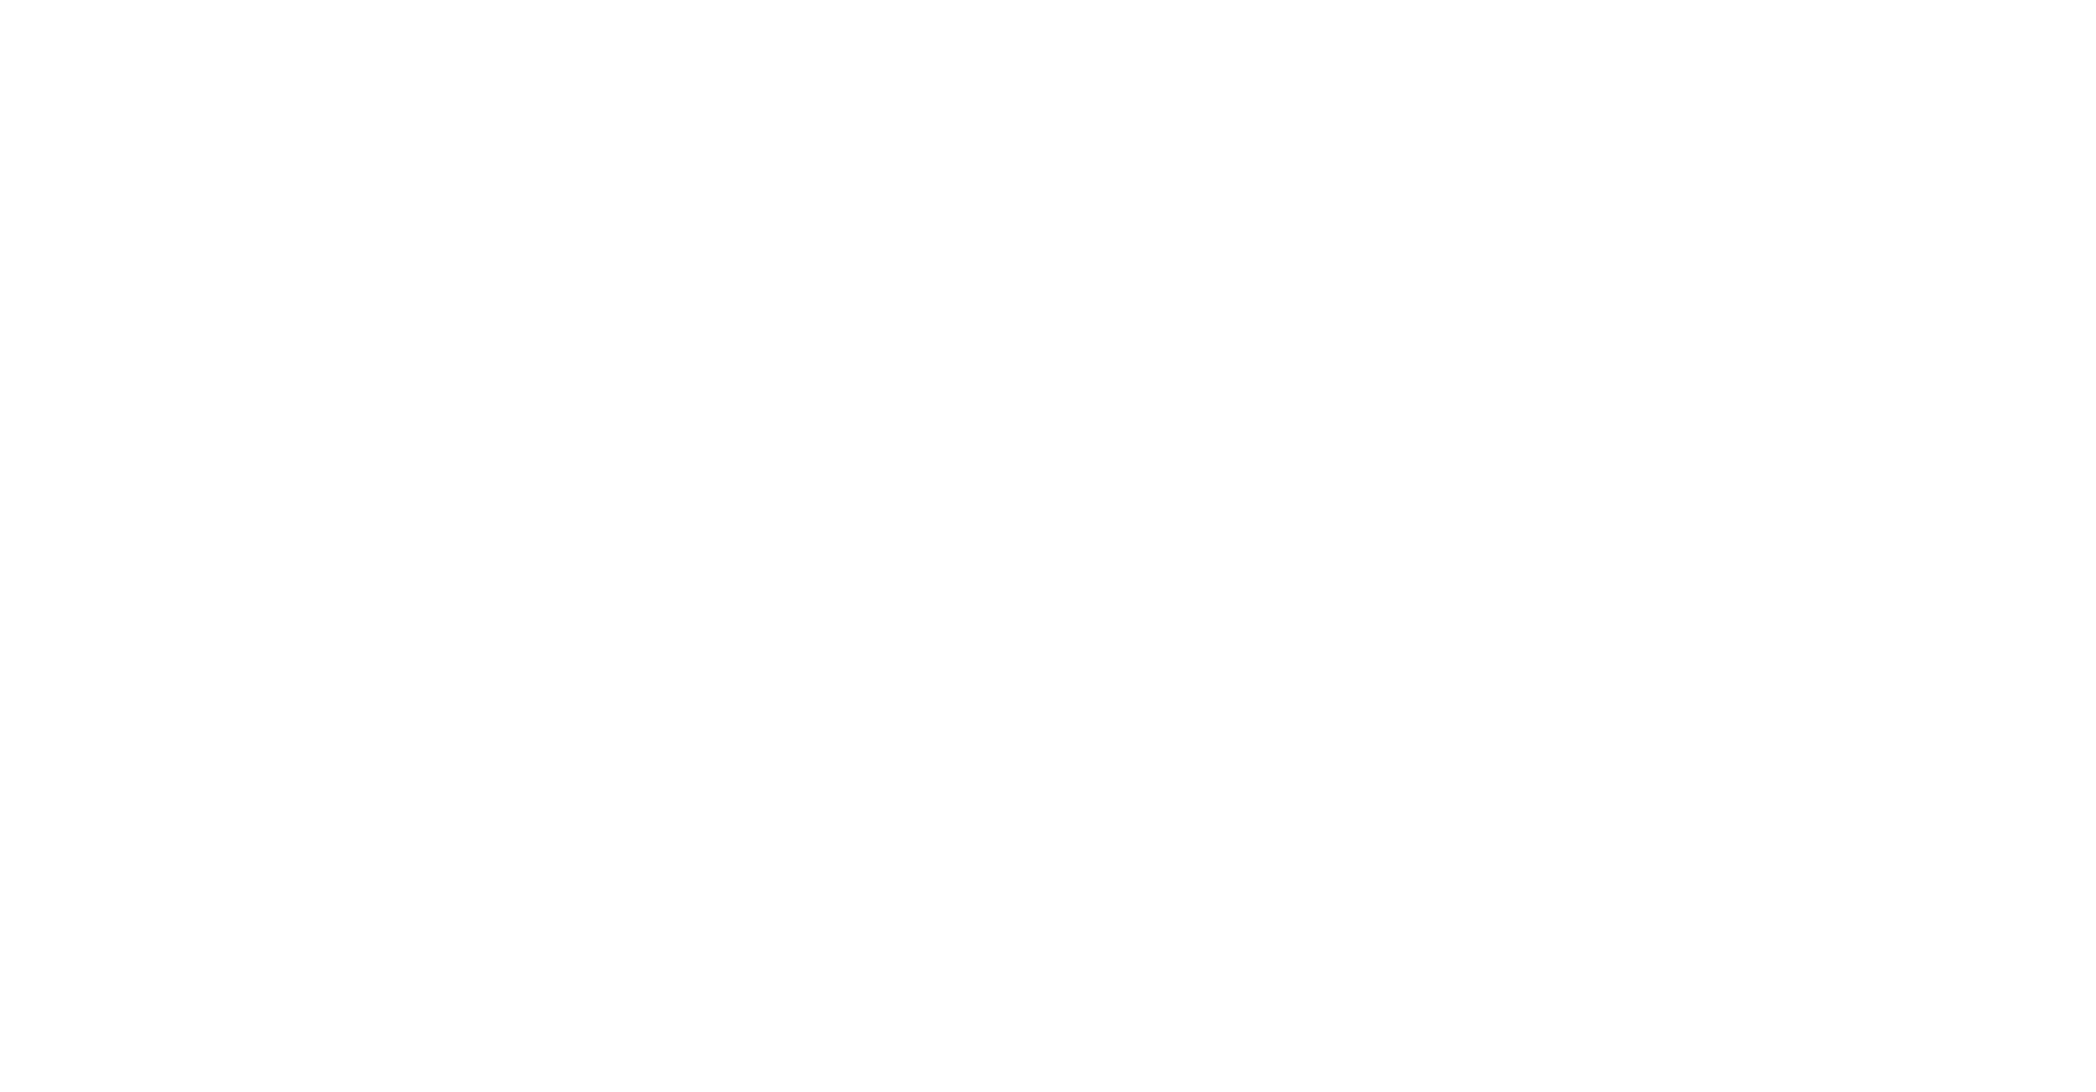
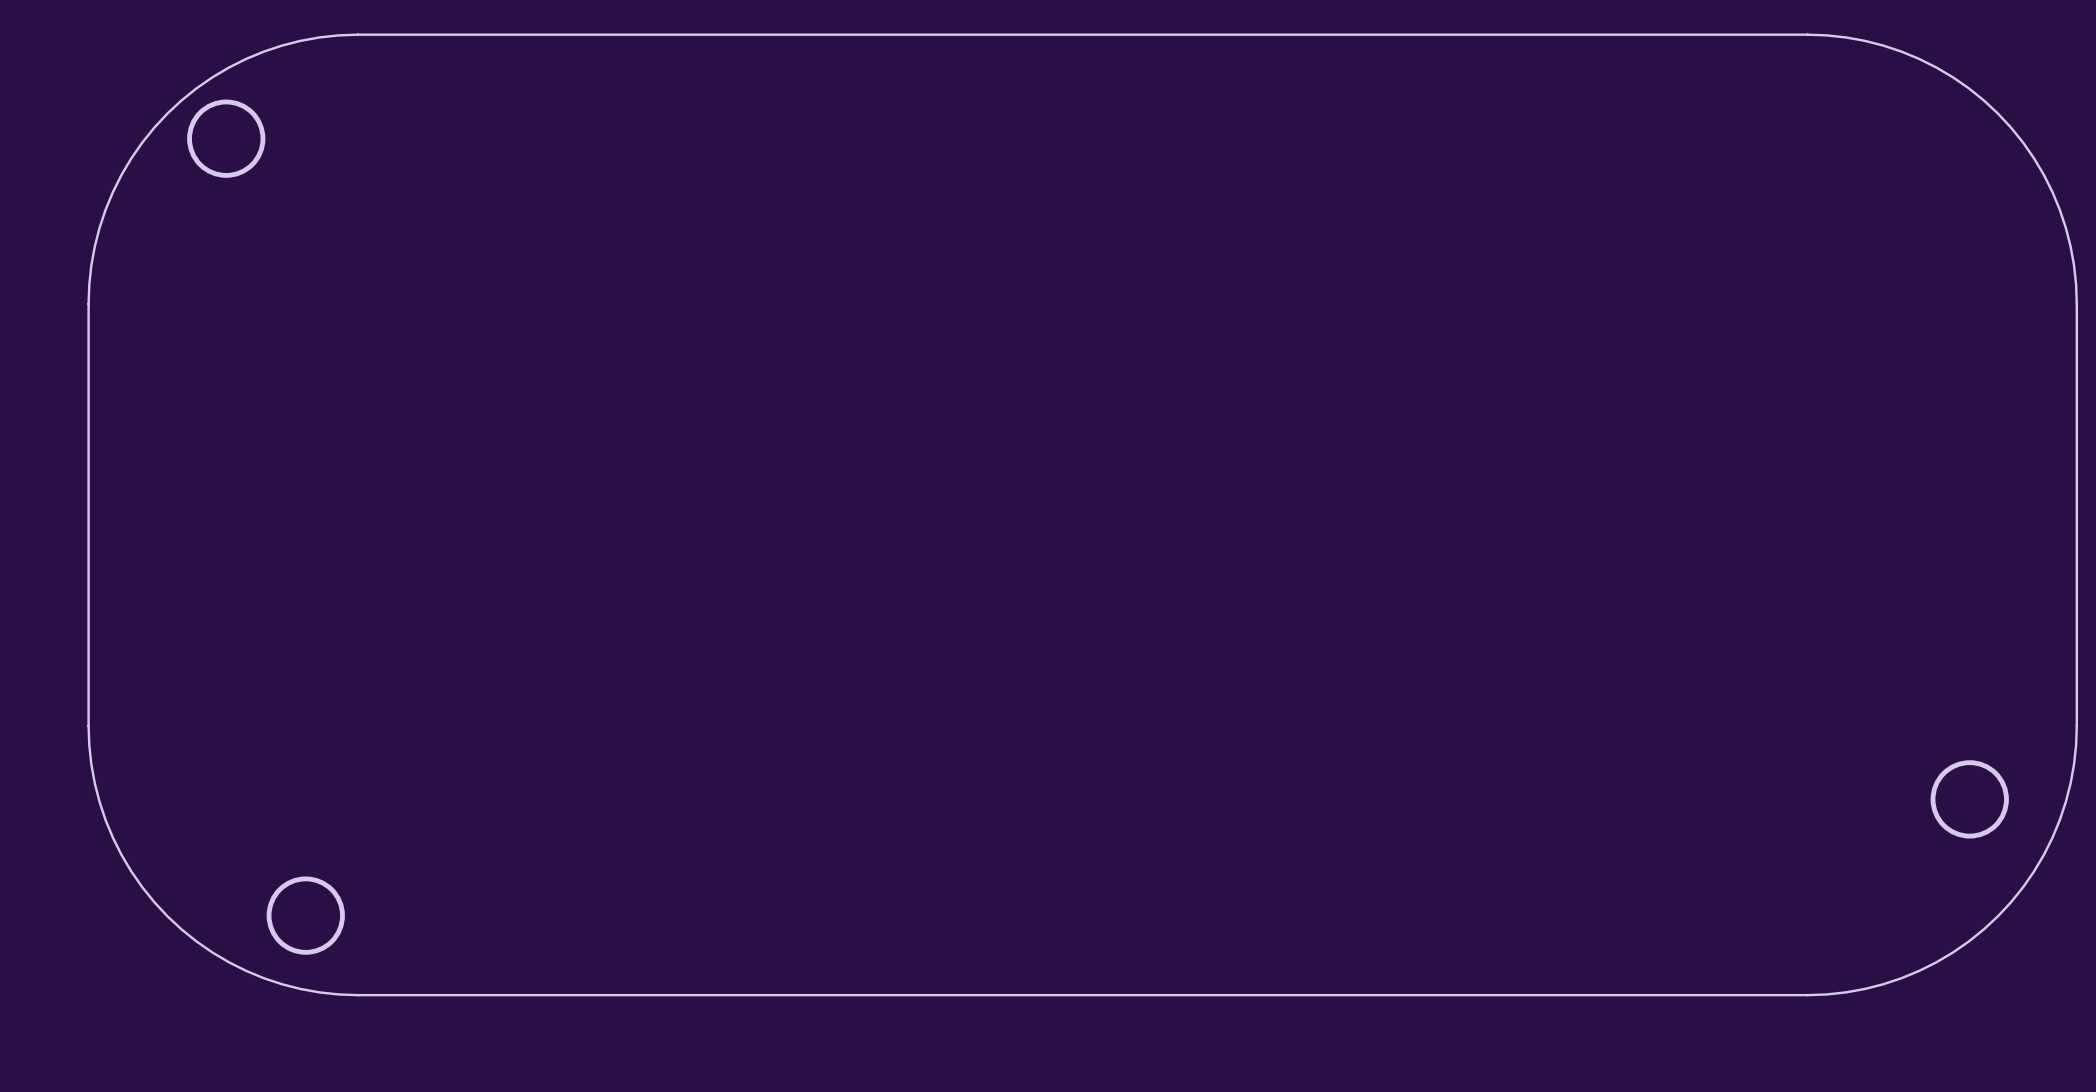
board edge: none -> (357, 34) (1807, 34) (1864, 40) (1919, 59) (1953, 77) (1983, 100) (2023, 142) (2043, 174) (2059, 209) (2074, 265) (2076, 303) (2076, 745) (2065, 801) (2052, 837) (2034, 871) (2011, 902) (1968, 941) (1936, 962) (1901, 978) (1864, 988) (1826, 994) (357, 995) (300, 988) (246, 970) (196, 941) (154, 902) (121, 854) (105, 819) (94, 783) (88, 725) (88, 303) (91, 265) (105, 209) (121, 174) (154, 127) (181, 100) (228, 67) (263, 51) (319, 37) (357, 34)
round board edge: none -> [187, 99, 266, 178]
round board edge: none -> [1930, 760, 2009, 839]
round board edge: none -> [266, 876, 345, 955]

